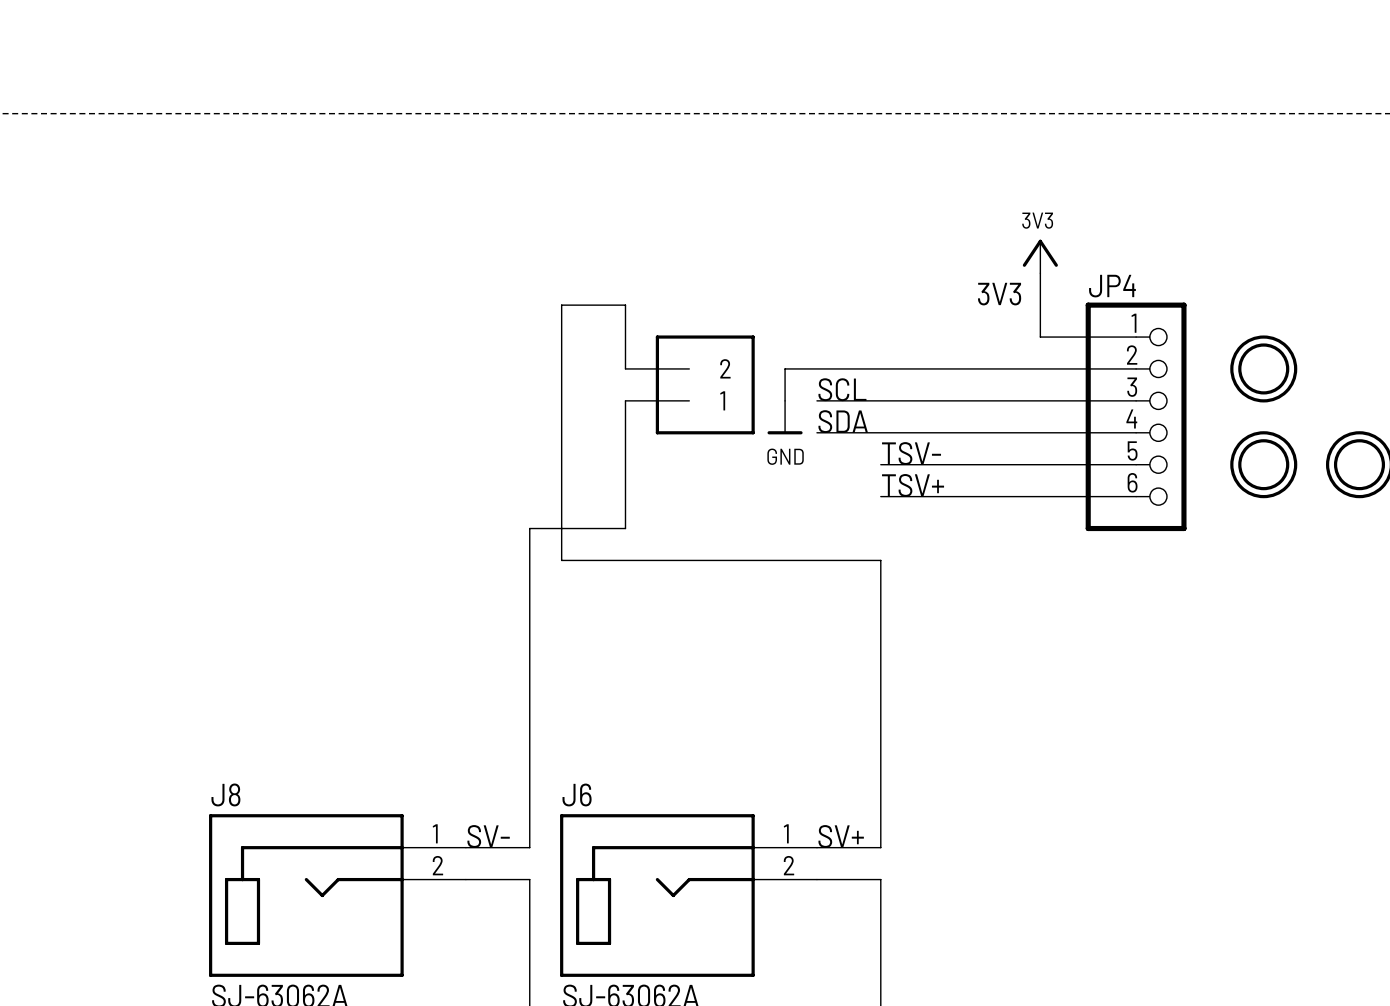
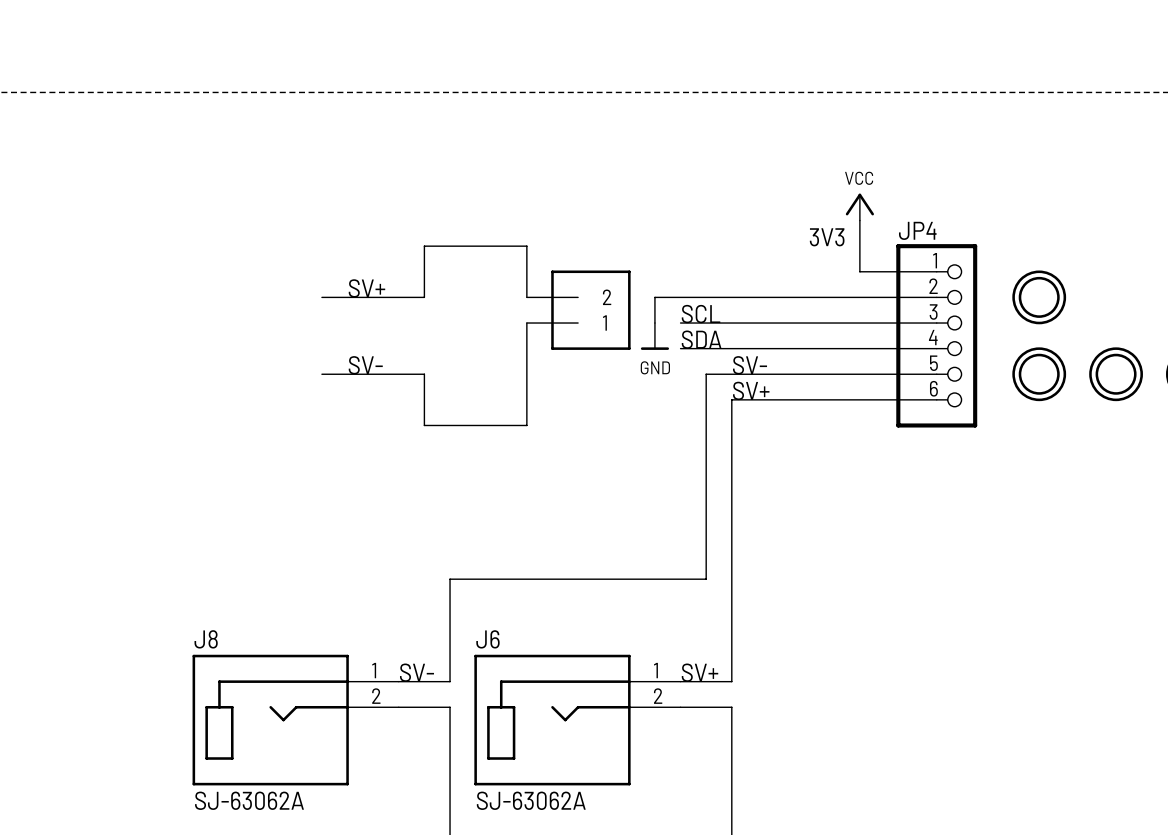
power symbol: 3V3 (1040, 256) -> VCC (859, 207)
wire: (561, 305) (561, 560) (880, 560) -> (731, 399) (731, 451)
wire: none -> (475, 246) (424, 246) (424, 297) (321, 297)
label: none -> SV+ (366, 288)
label: none -> SV- (365, 365)
label: TSV- (911, 453) -> SV- (750, 365)
wire: none -> (731, 374) (706, 374) (706, 579) (450, 579)
label: TSV+ (913, 485) -> SV+ (751, 390)
wire: (529, 528) (529, 720) -> (450, 425) (424, 425) (424, 374) (321, 374)

